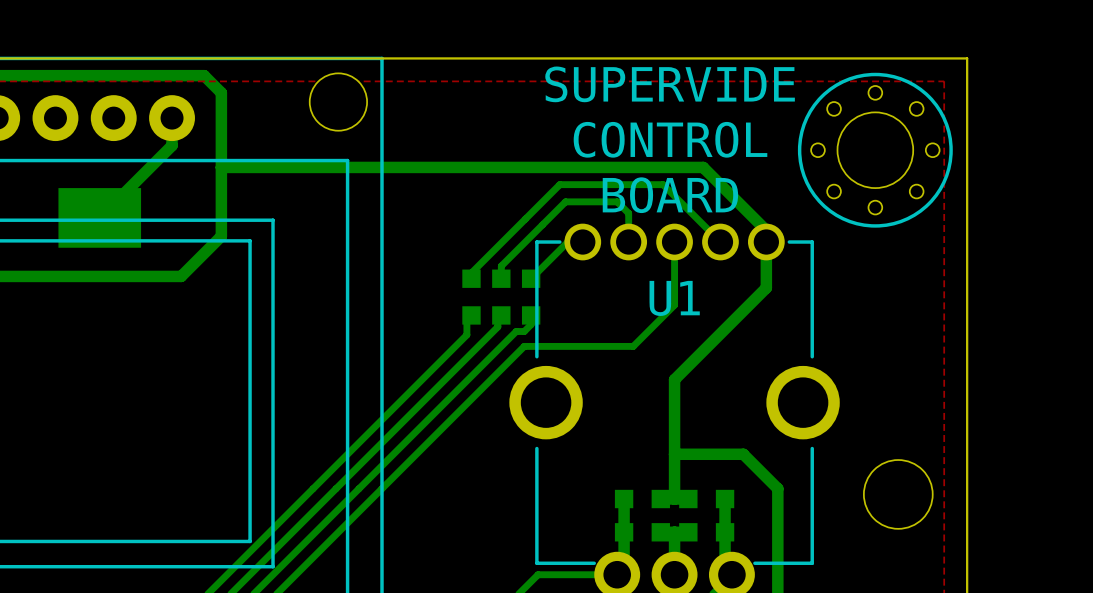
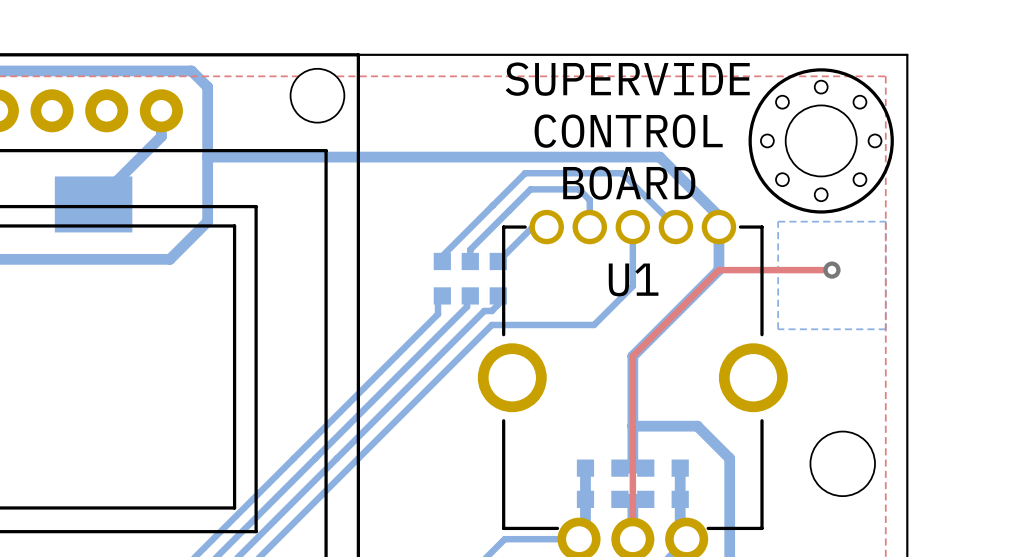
bottom zone outline: none -> (778, 221) (778, 329) (885, 329) (885, 221) (778, 221)
top track: none -> (831, 270) (718, 270) (632, 356) (632, 539)
via: none -> (831, 270)

